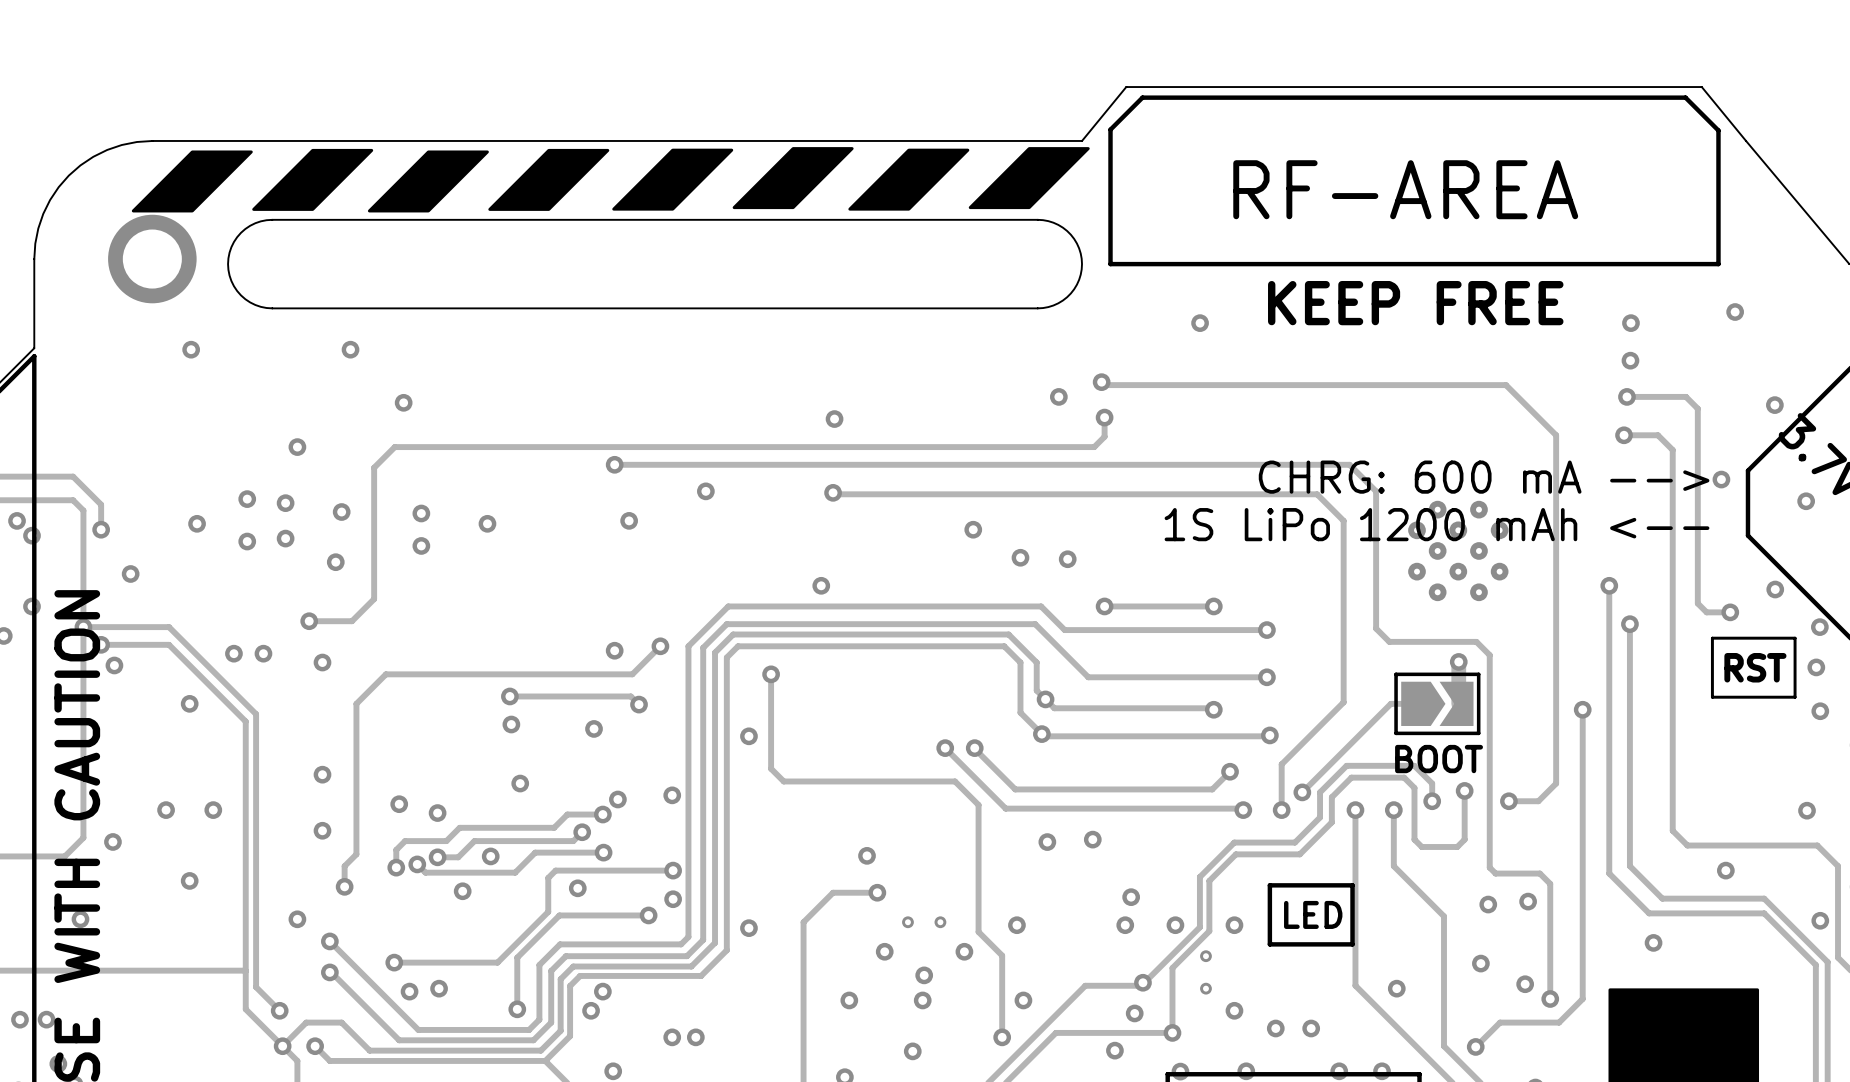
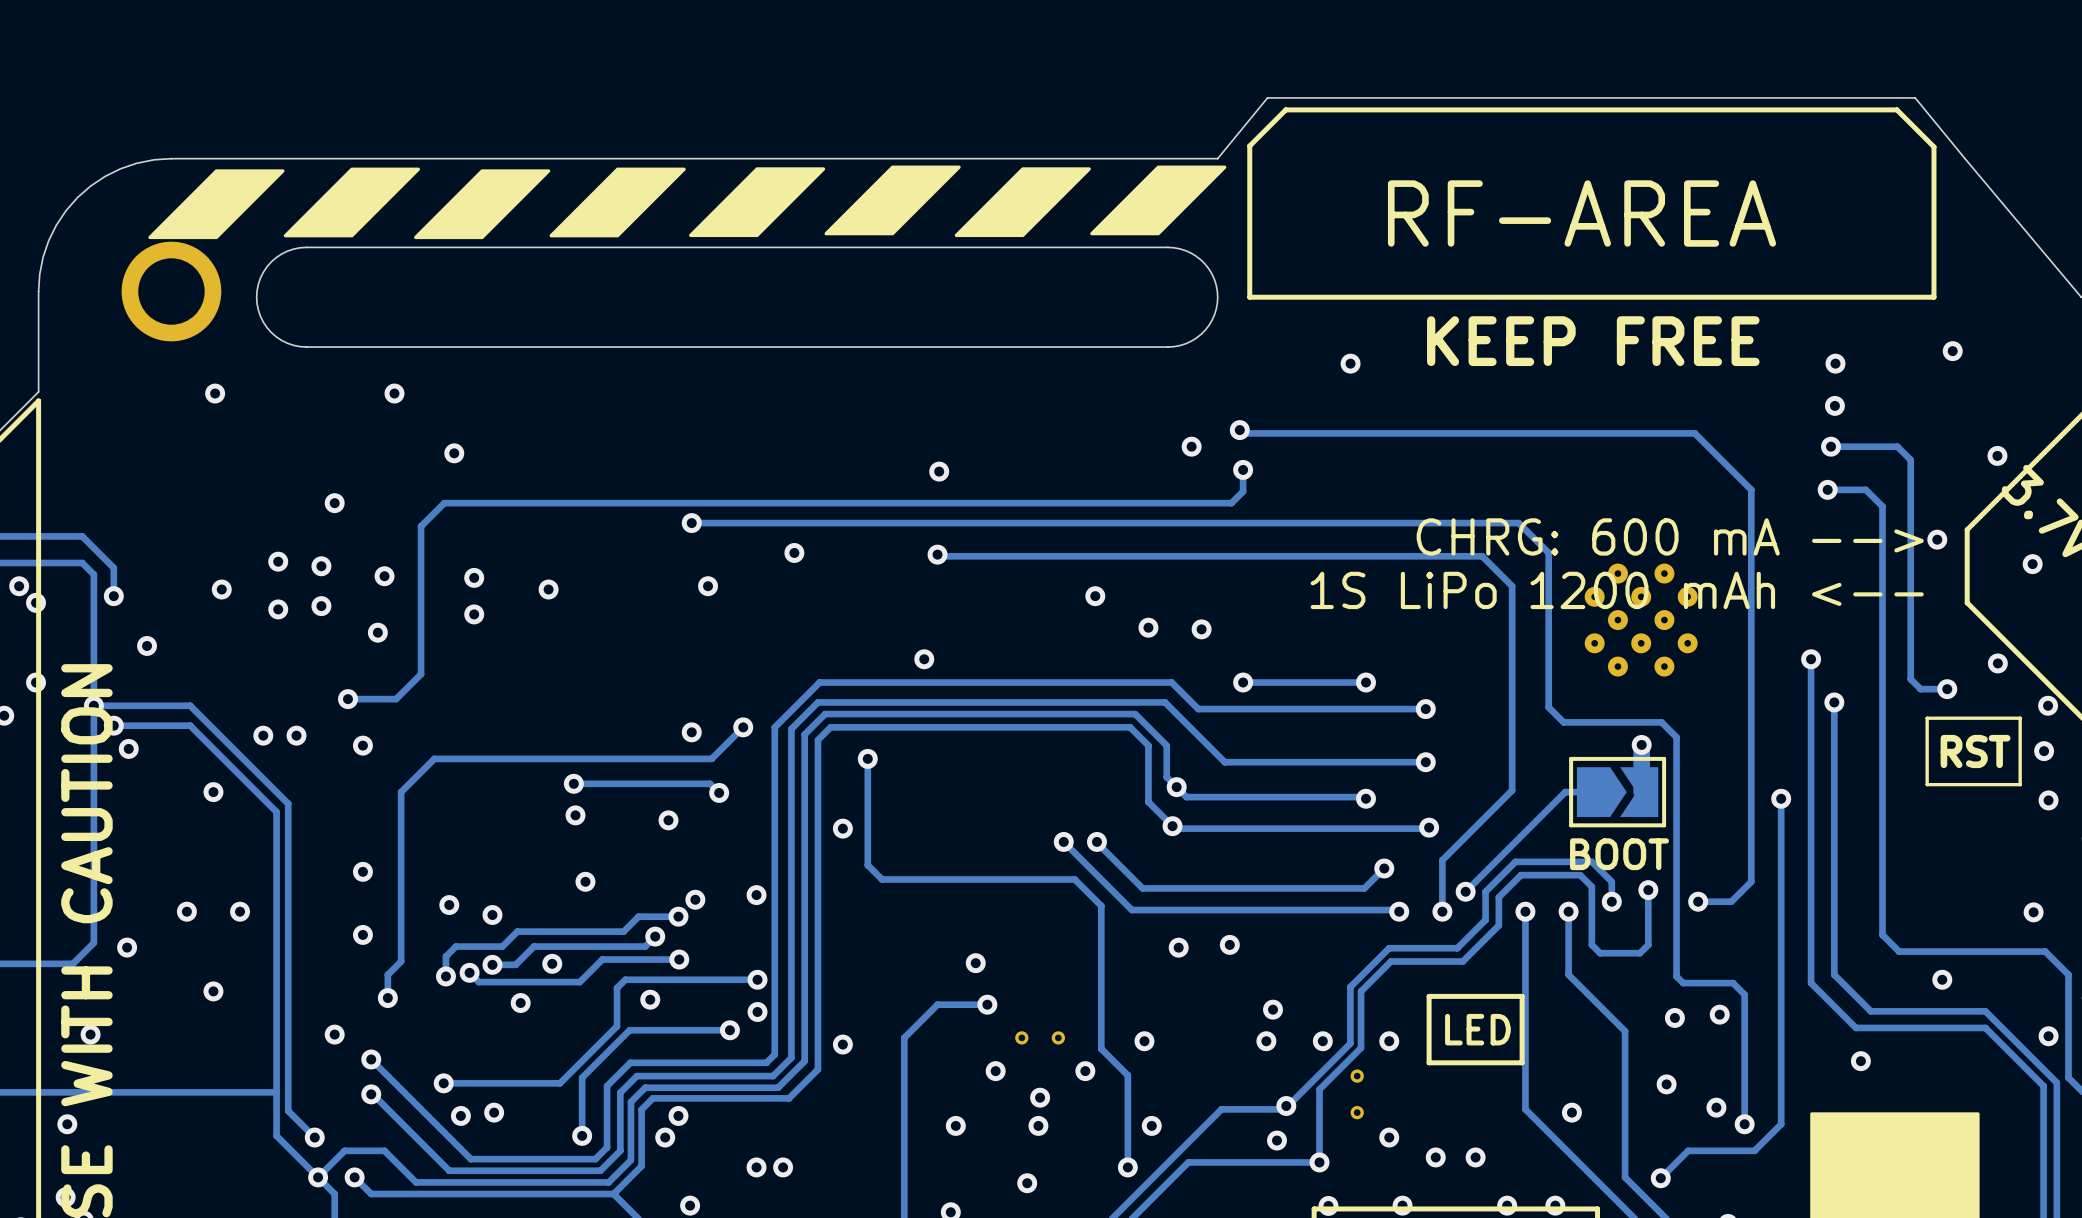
via: none -> (67, 1124)
via: (19, 1019) -> none
via: (46, 1019) -> none
via: (1114, 1050) -> none

